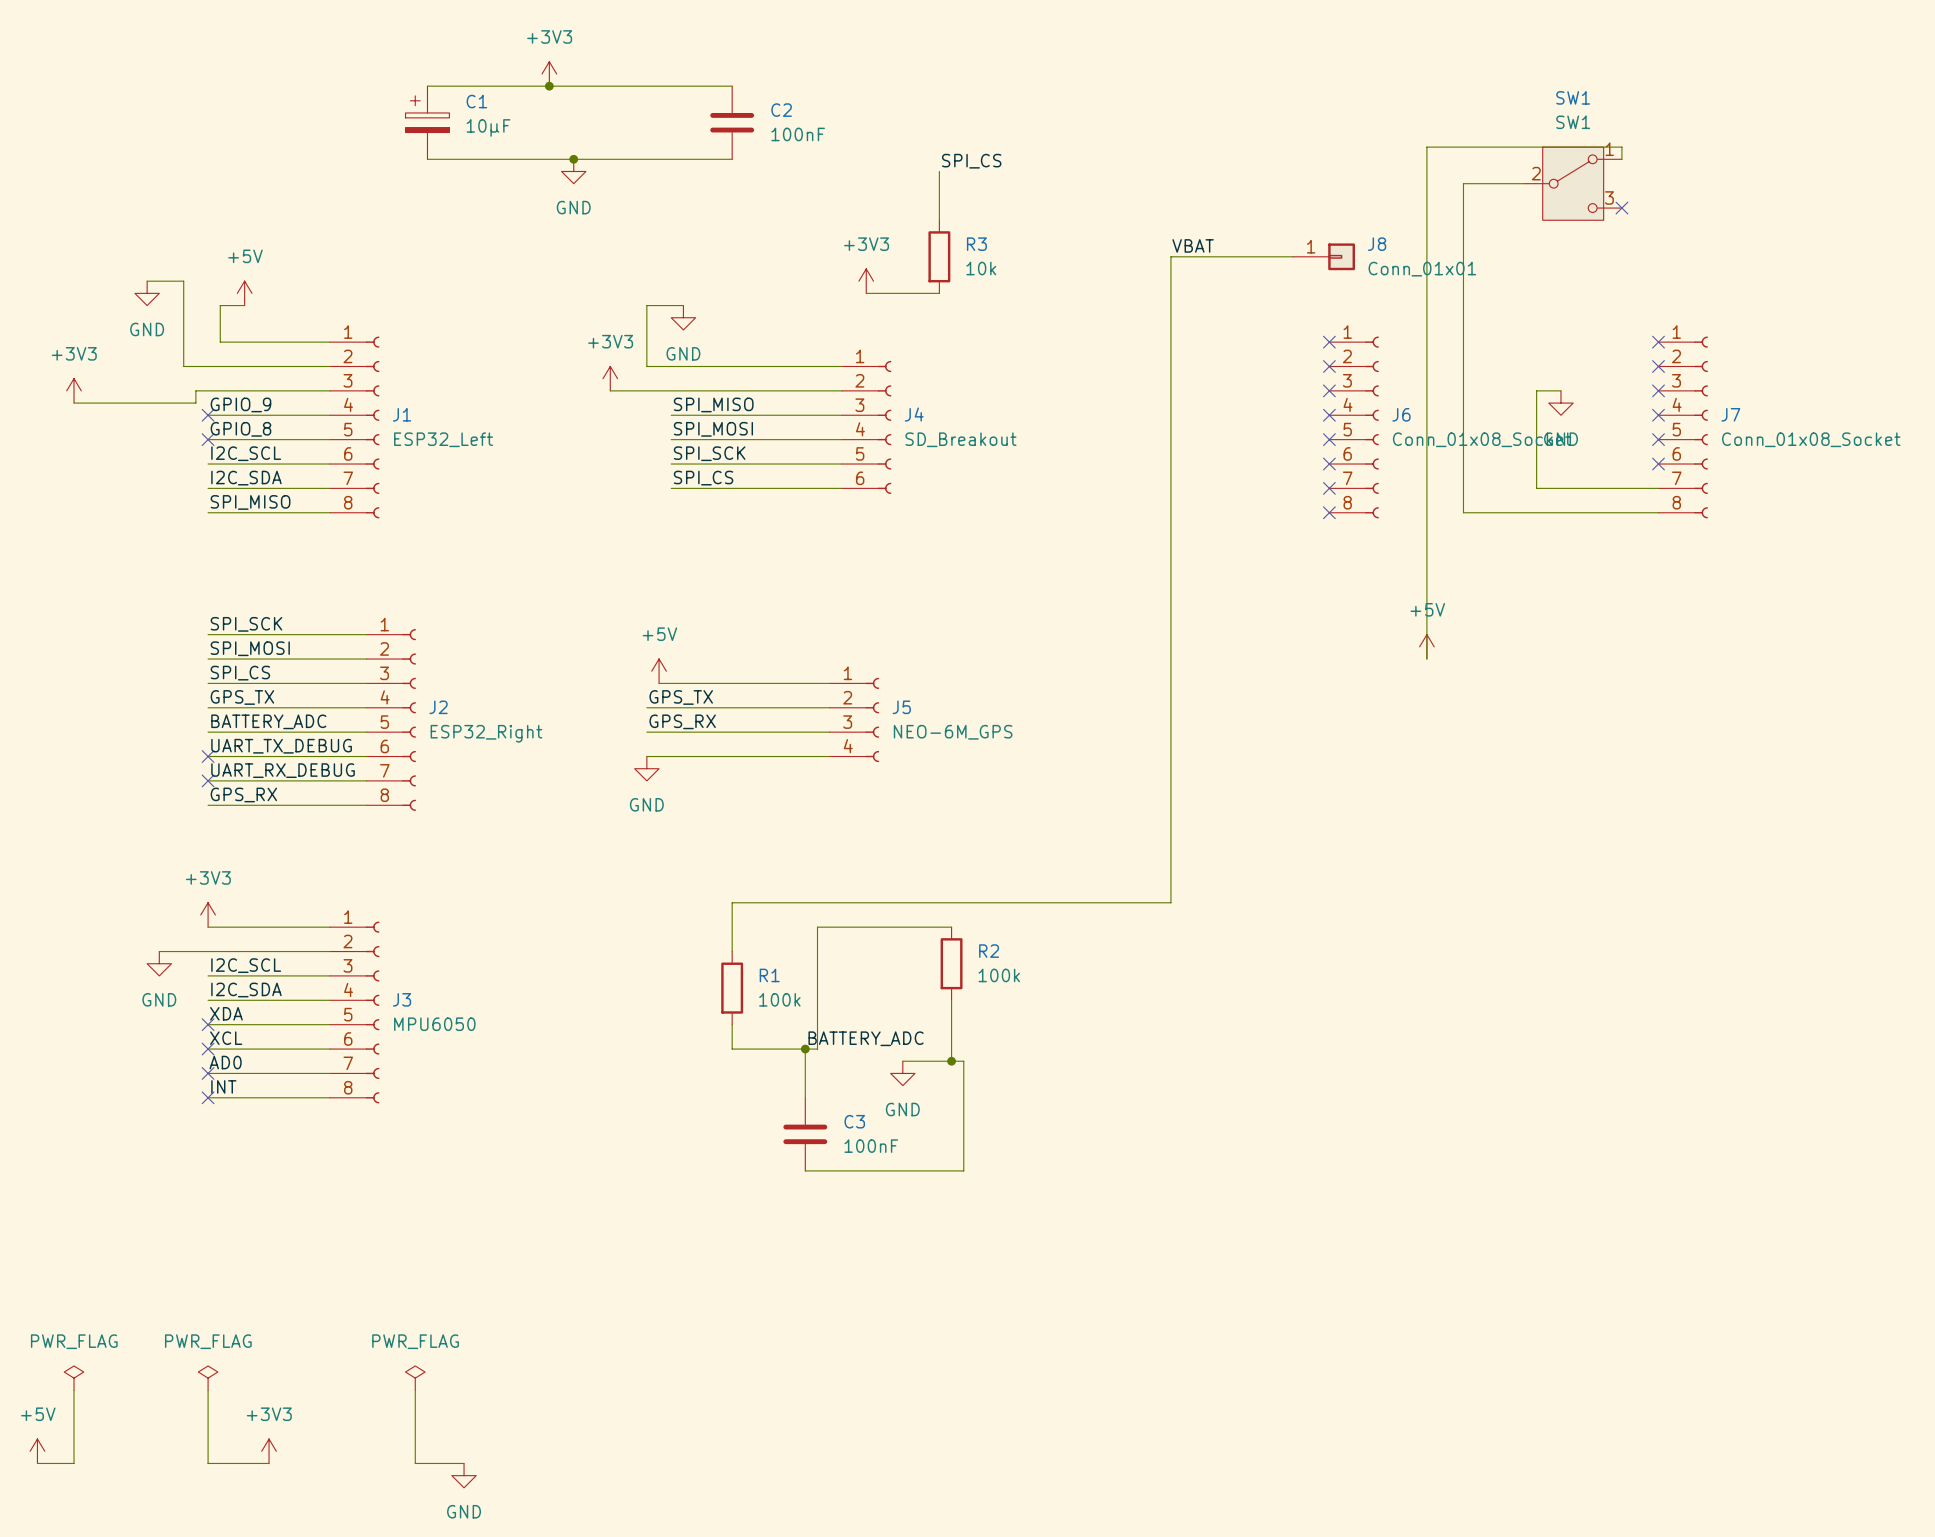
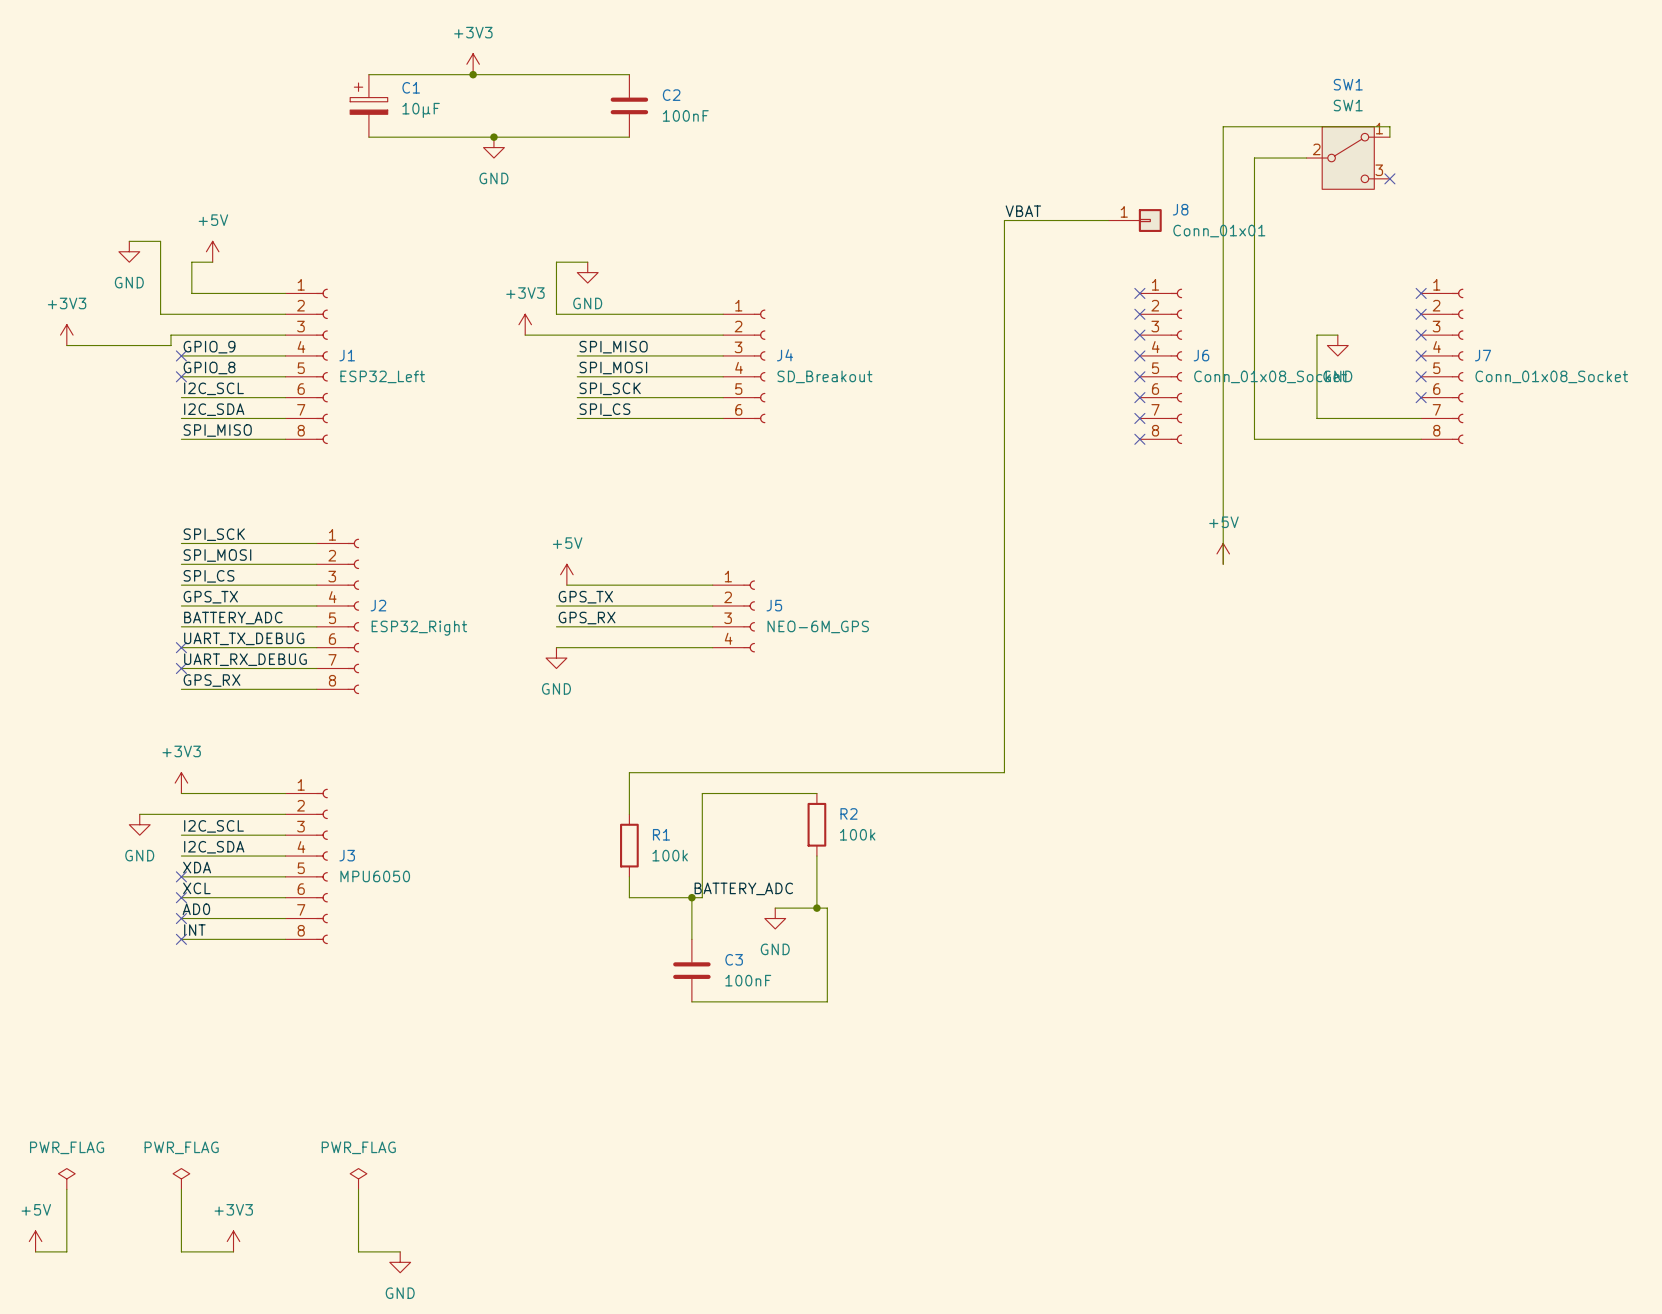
label: SPI_CS (971, 161) -> none
wire: (939, 171) (939, 220) -> none
R3: 10k (939, 256) -> none
power symbol: +3V3 (866, 281) -> none
wire: (866, 293) (939, 293) -> none

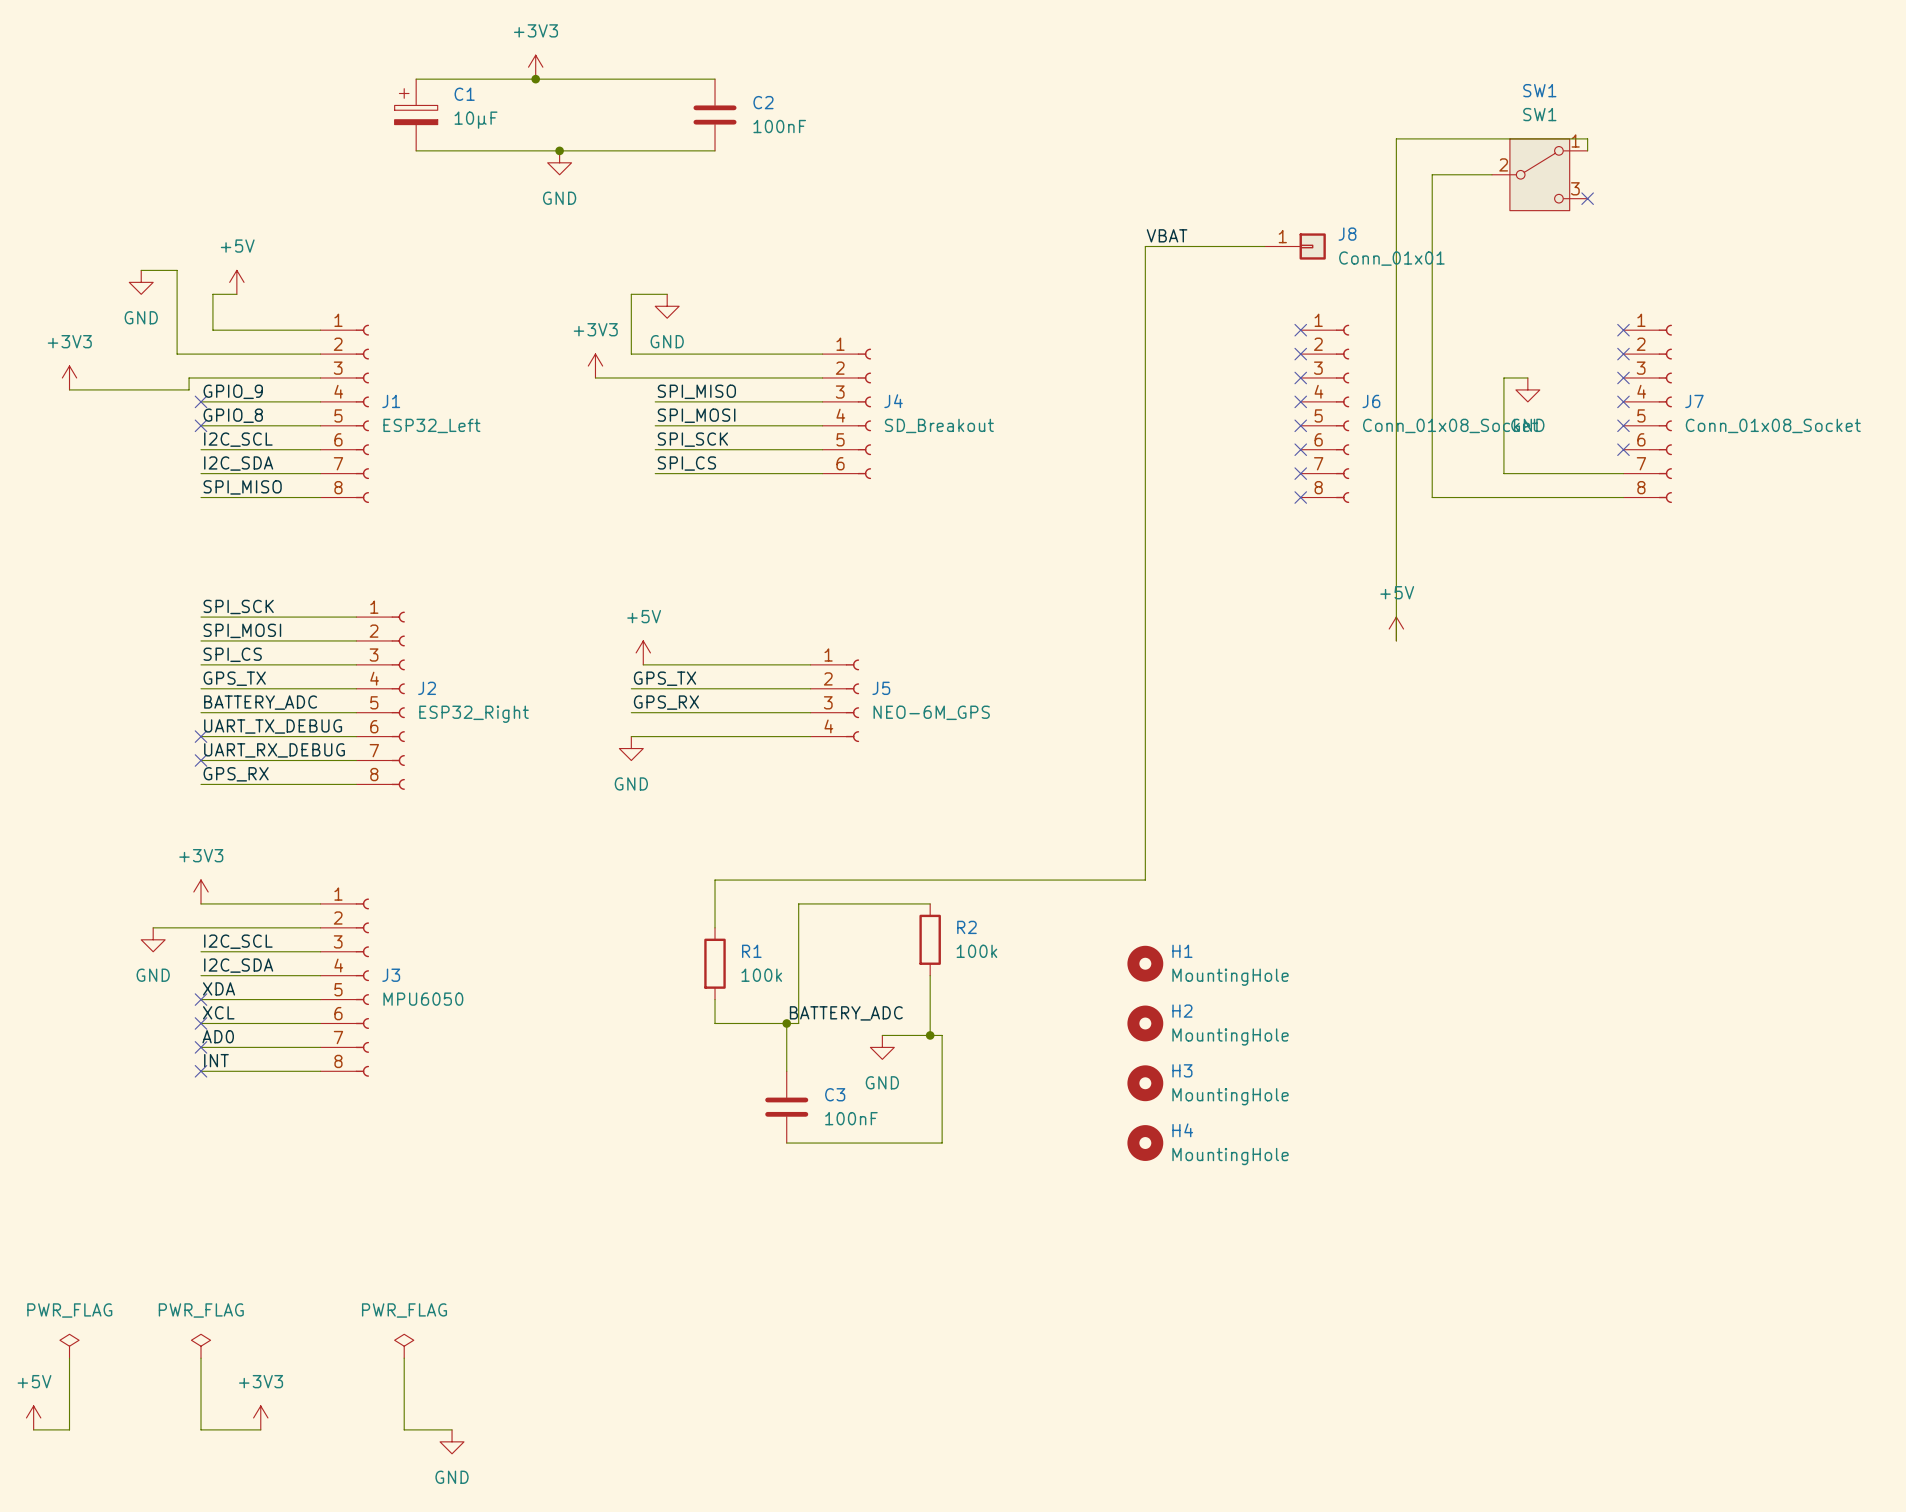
H1: none -> MountingHole (1145, 963)
H2: none -> MountingHole (1145, 1023)
H3: none -> MountingHole (1145, 1083)
H4: none -> MountingHole (1145, 1143)

